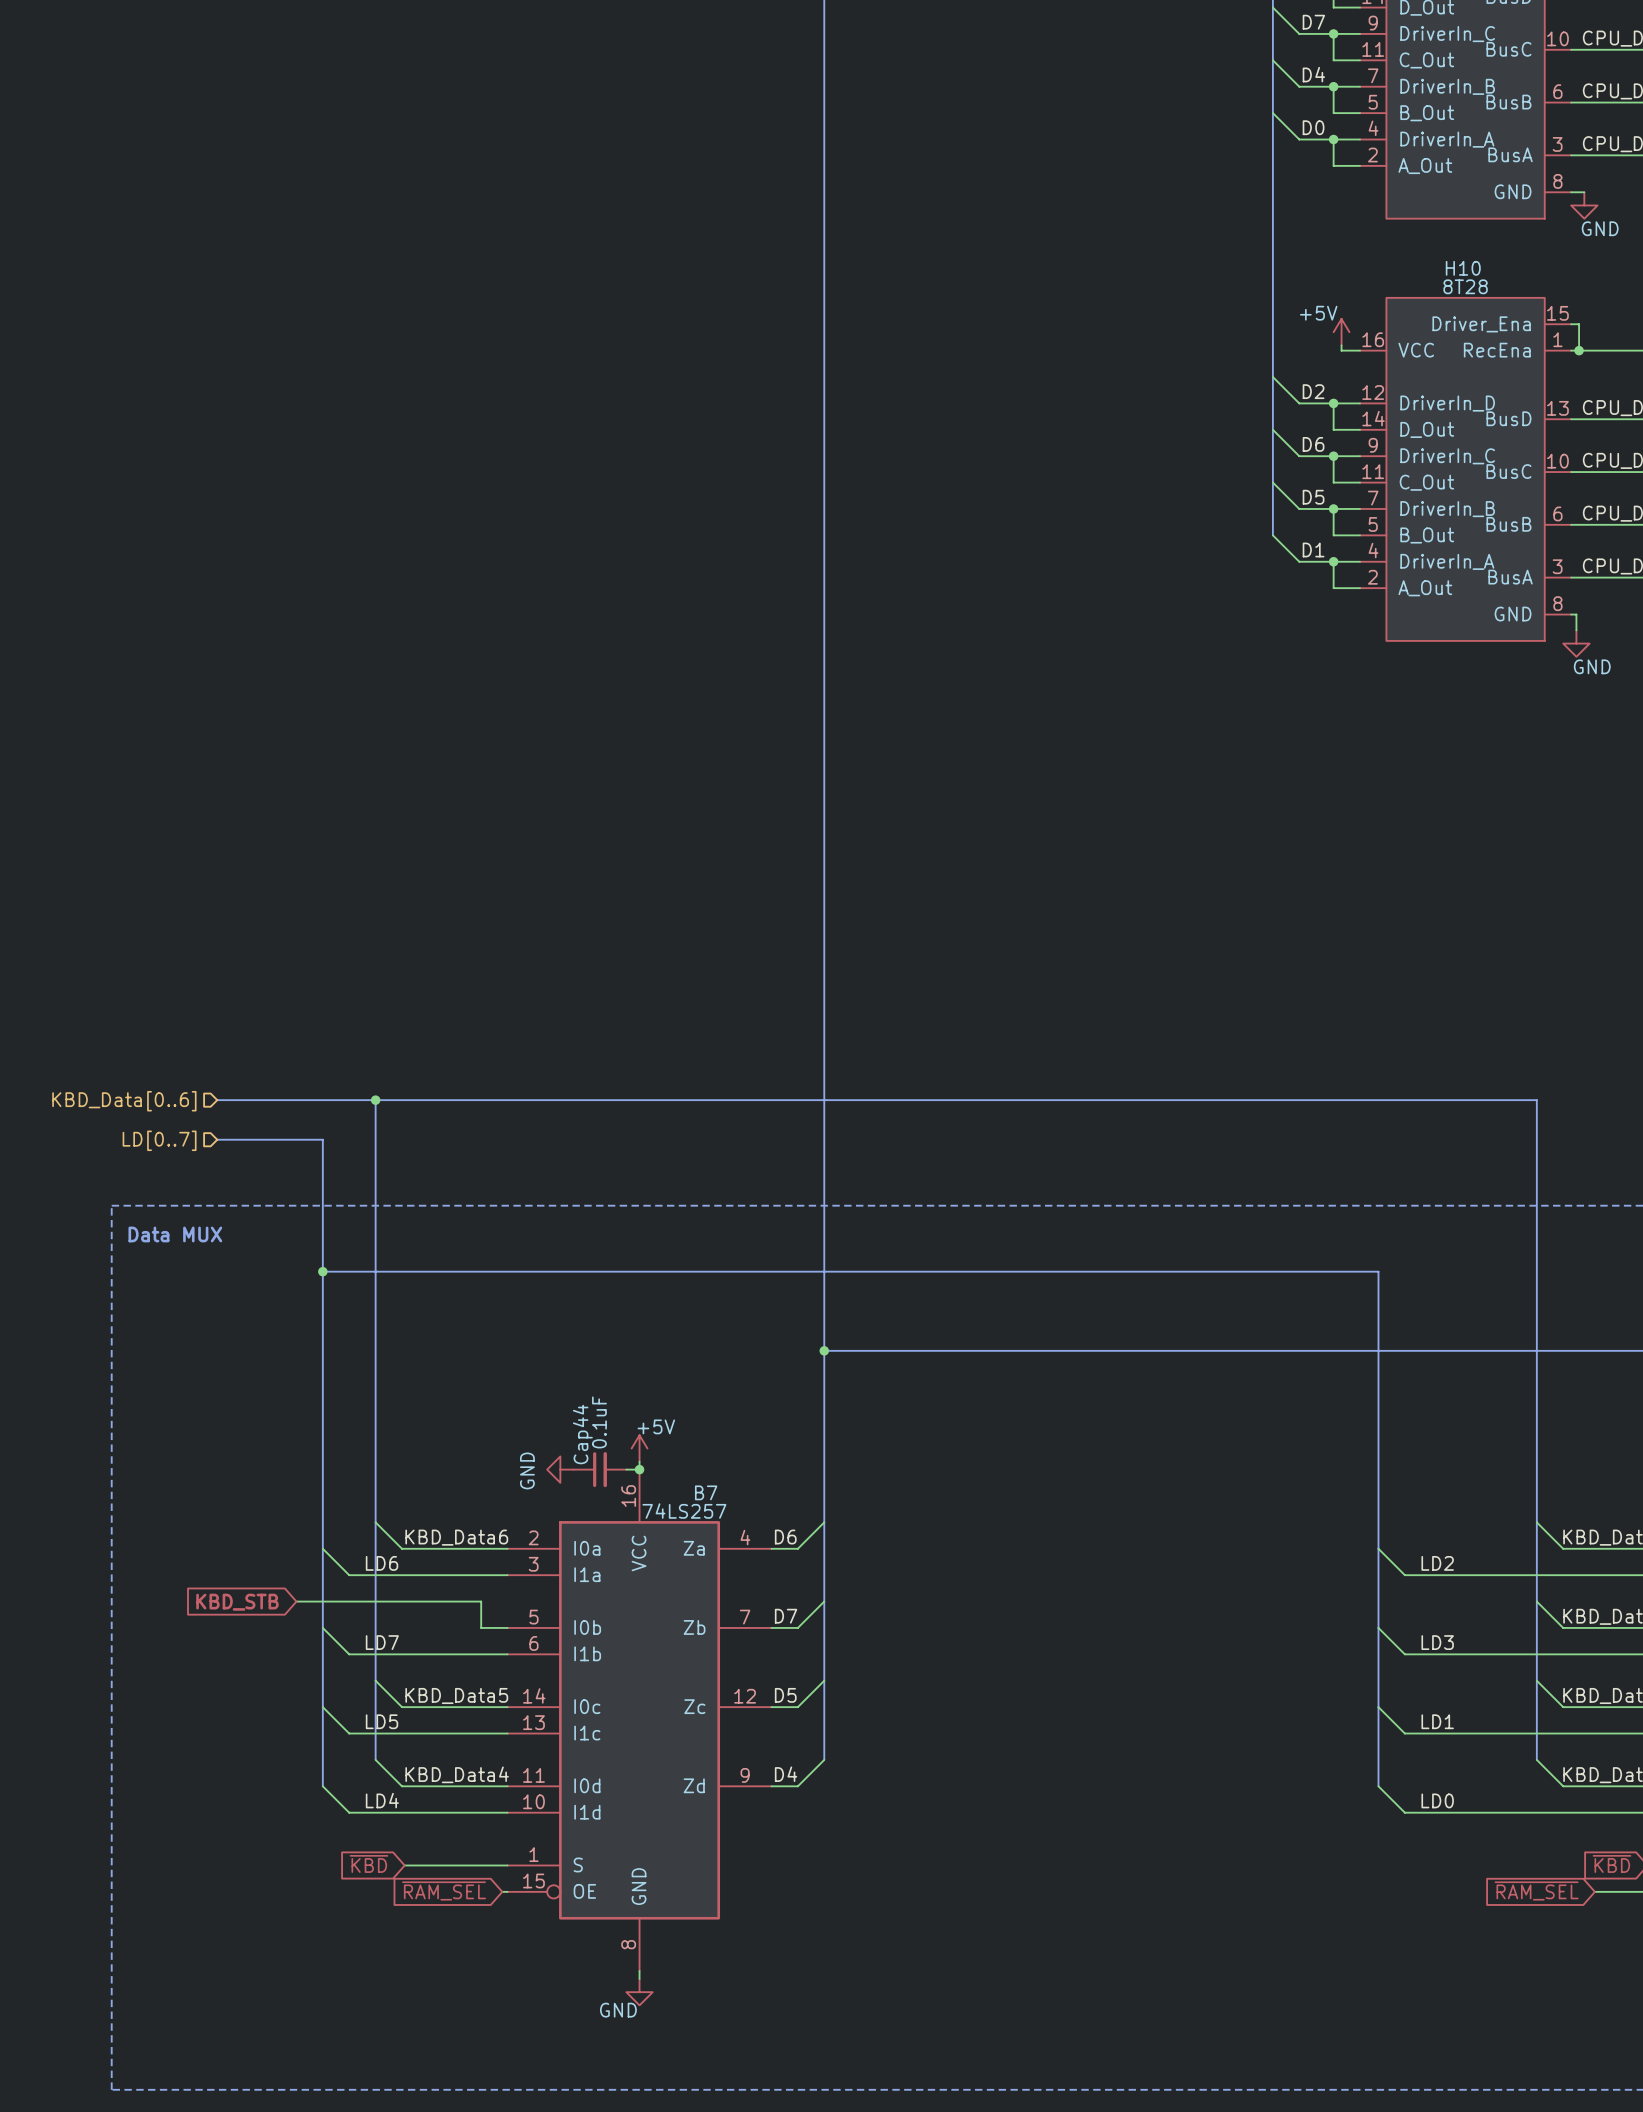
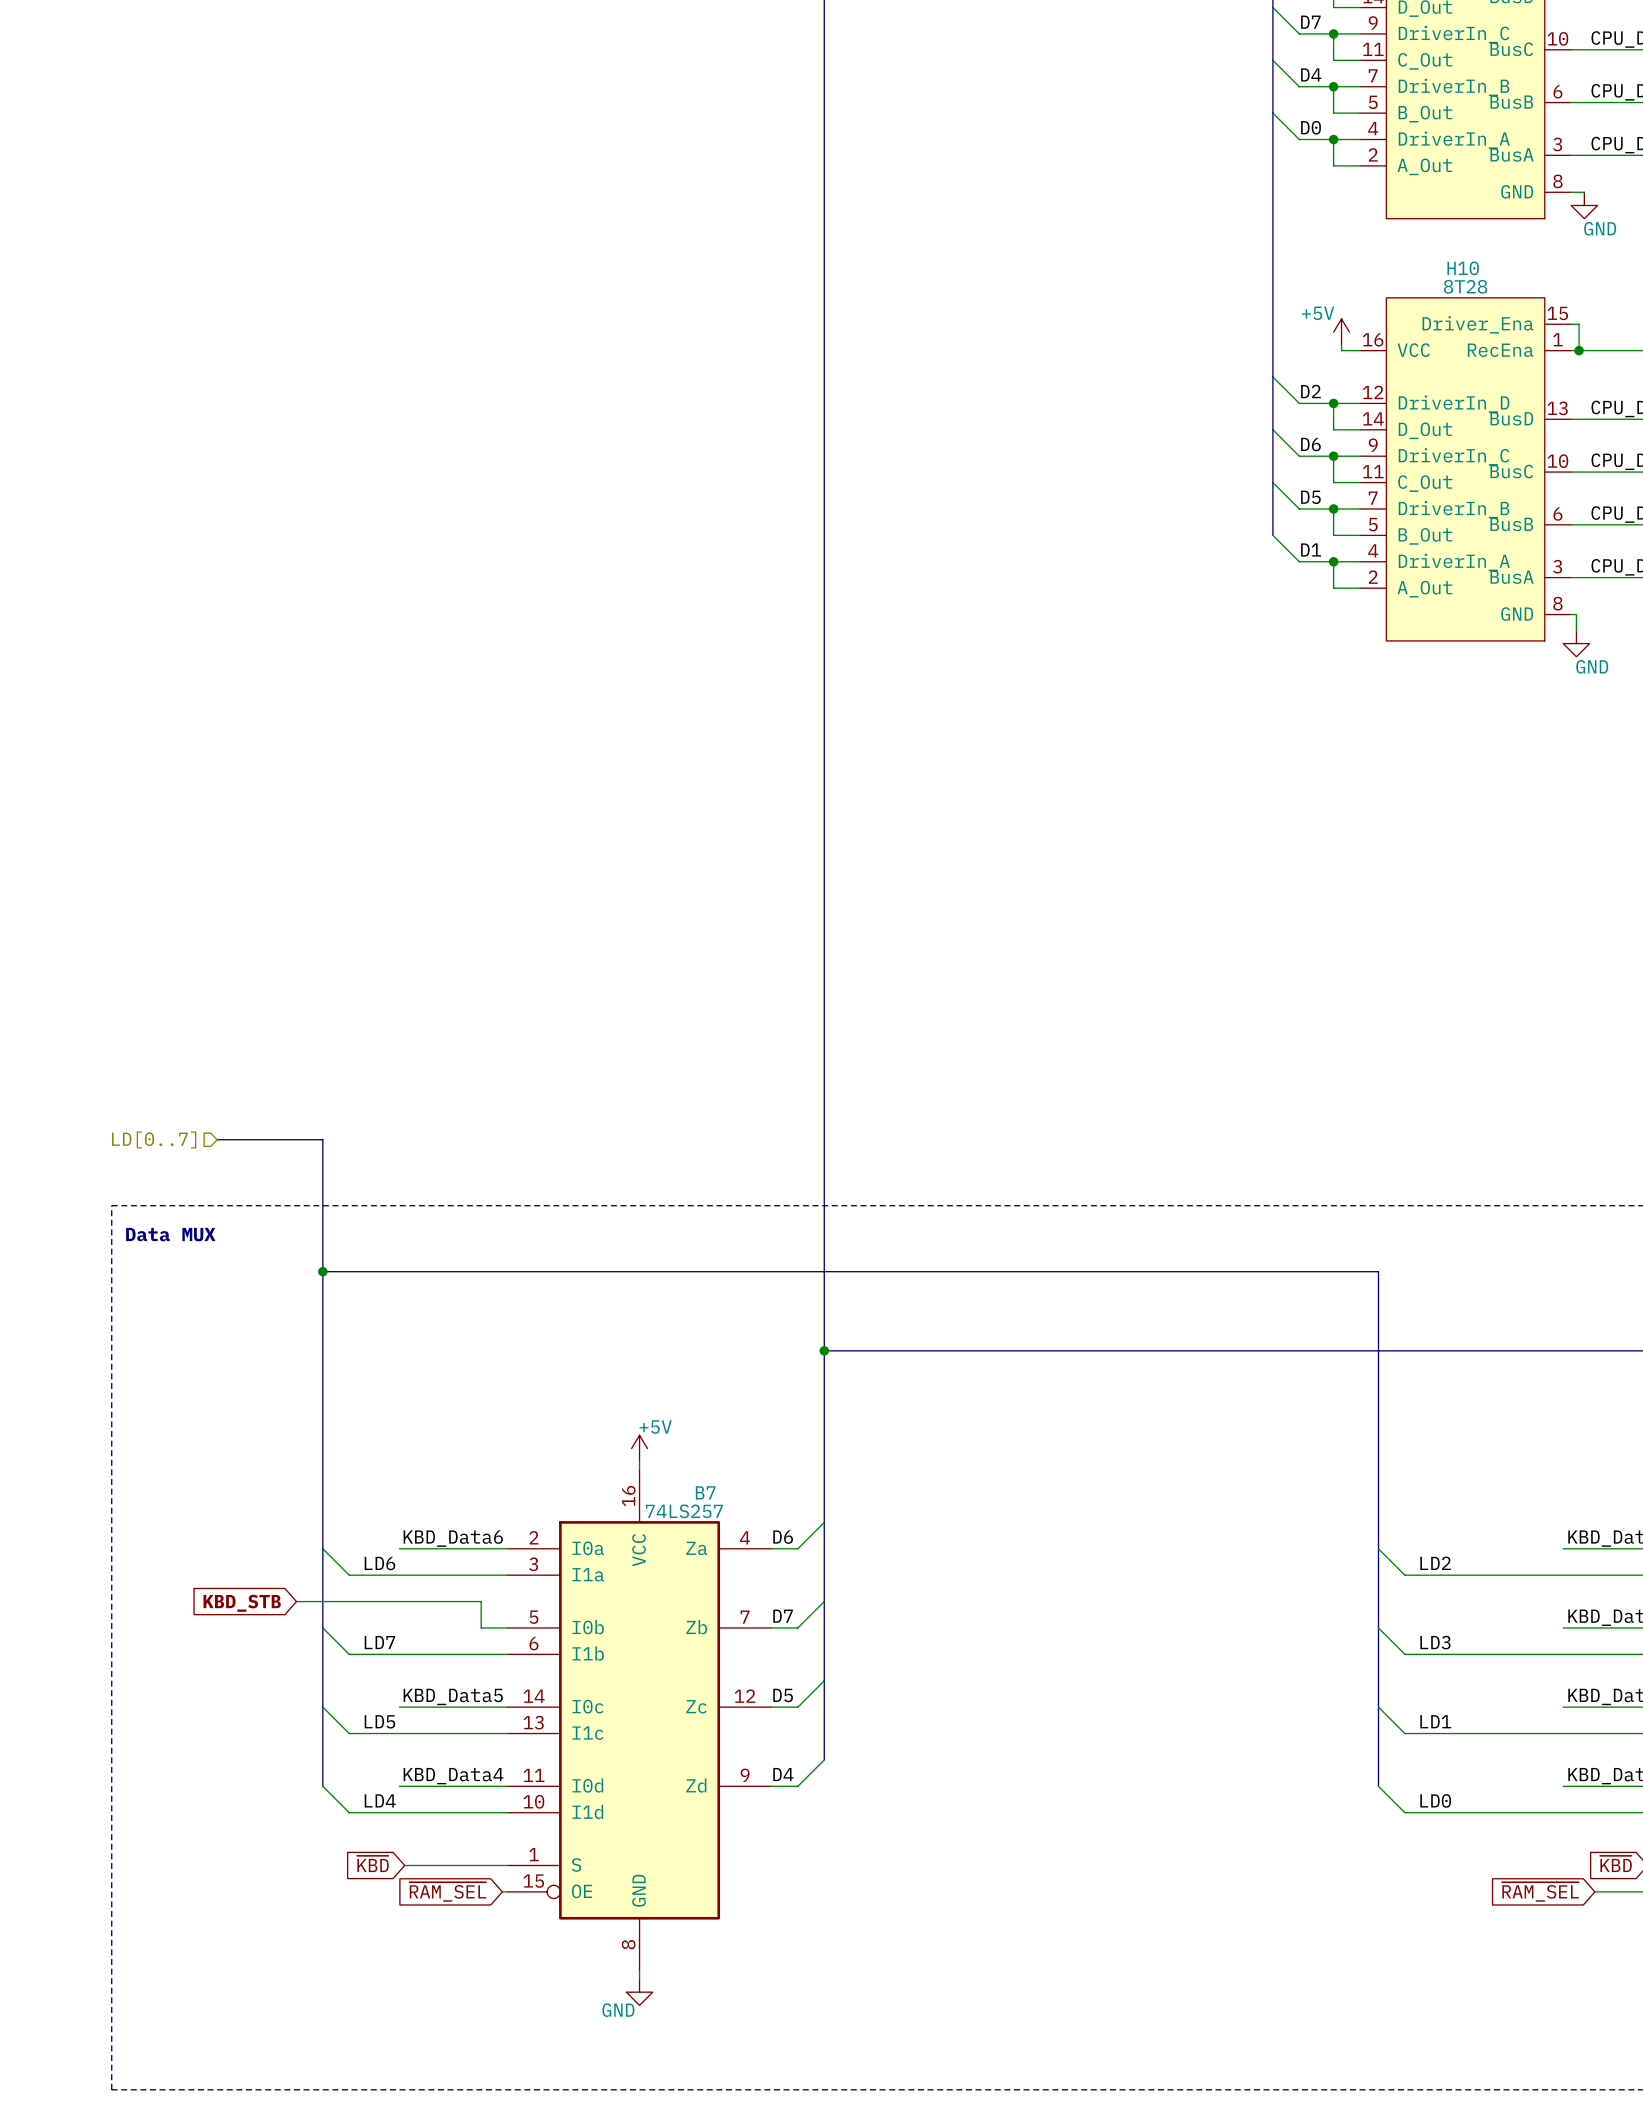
bus: (217, 1100) (1536, 1100) (1536, 1759) -> none
bus: (375, 1100) (375, 1759) -> none
junction: (375, 1100) -> none
hierarchical label: KBD_Data[0..6] (124, 1101) -> none
power symbol: GND (560, 1469) -> none
Cap44: 0.1uF (599, 1469) -> none
wire: (626, 1469) (639, 1469) -> none
junction: (639, 1469) -> none
wire: (375, 1522) (402, 1548) -> (399, 1548) (402, 1548)
wire: (1536, 1522) (1563, 1548) -> none
wire: (1536, 1601) (1563, 1627) -> none
wire: (375, 1680) (402, 1707) -> (399, 1707) (402, 1707)
wire: (1536, 1680) (1563, 1707) -> none
wire: (375, 1759) (402, 1786) -> (399, 1786) (402, 1786)
wire: (1536, 1759) (1563, 1786) -> none

